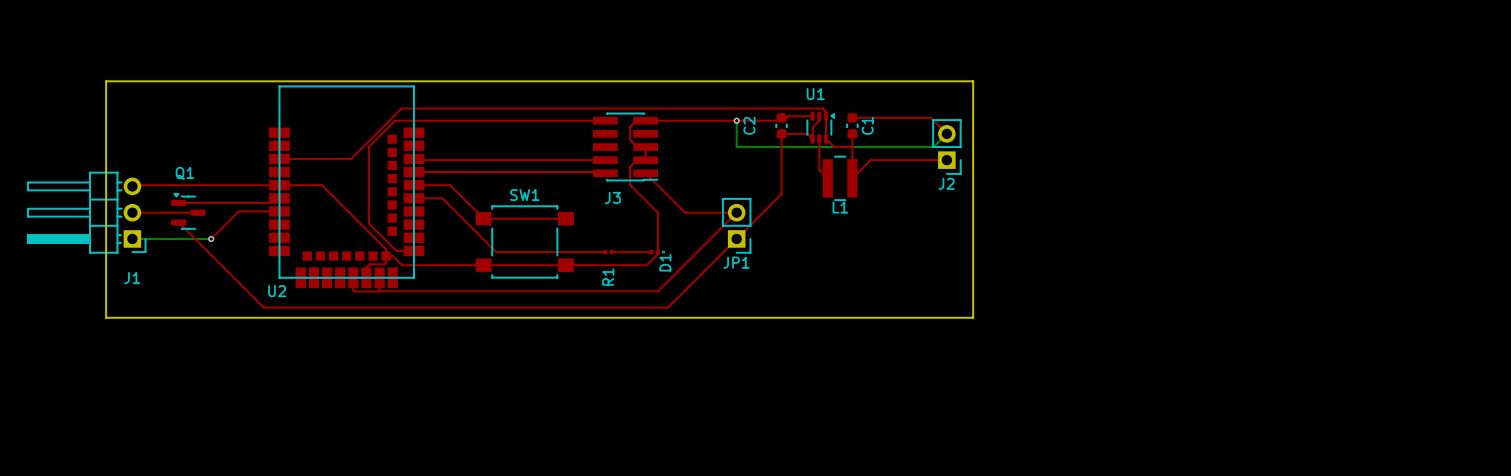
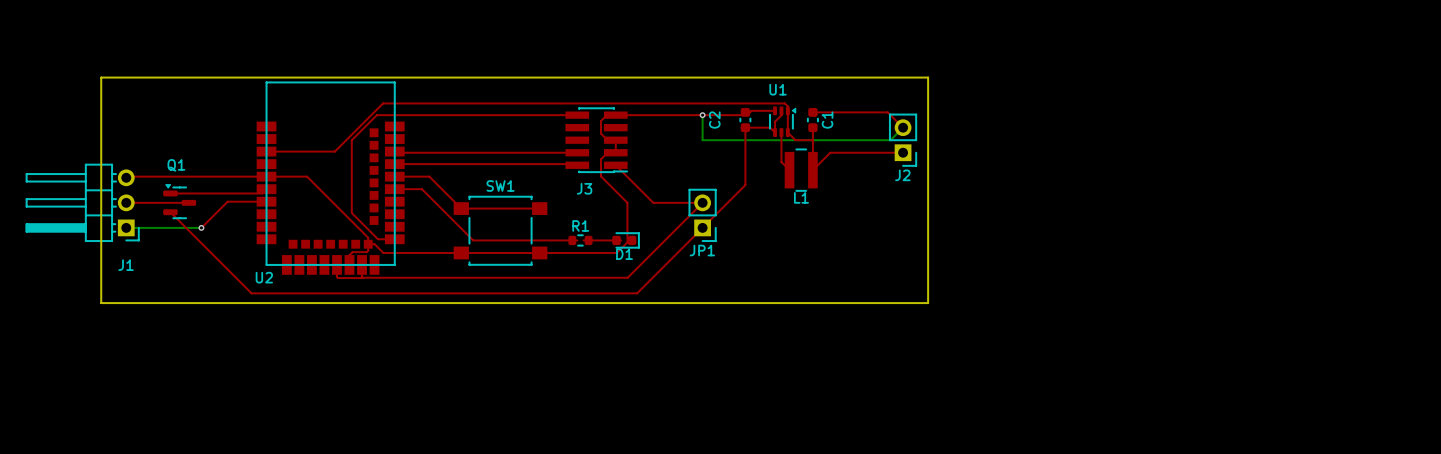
R1 footprint: [602, 250, 615, 255] -> [568, 234, 593, 247]
D1 footprint: [648, 250, 665, 255] -> [612, 232, 640, 249]
R1 name position: R1 (608, 276) -> R1 (580, 225)

